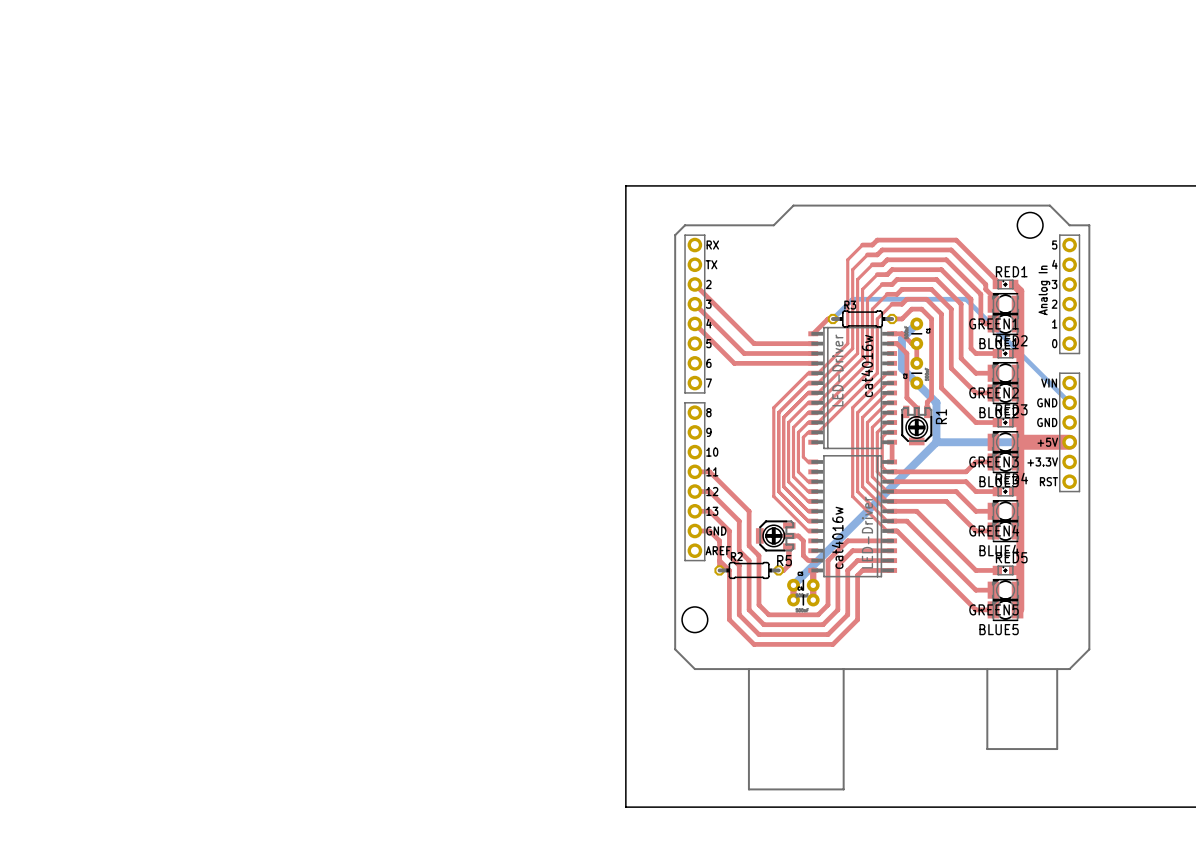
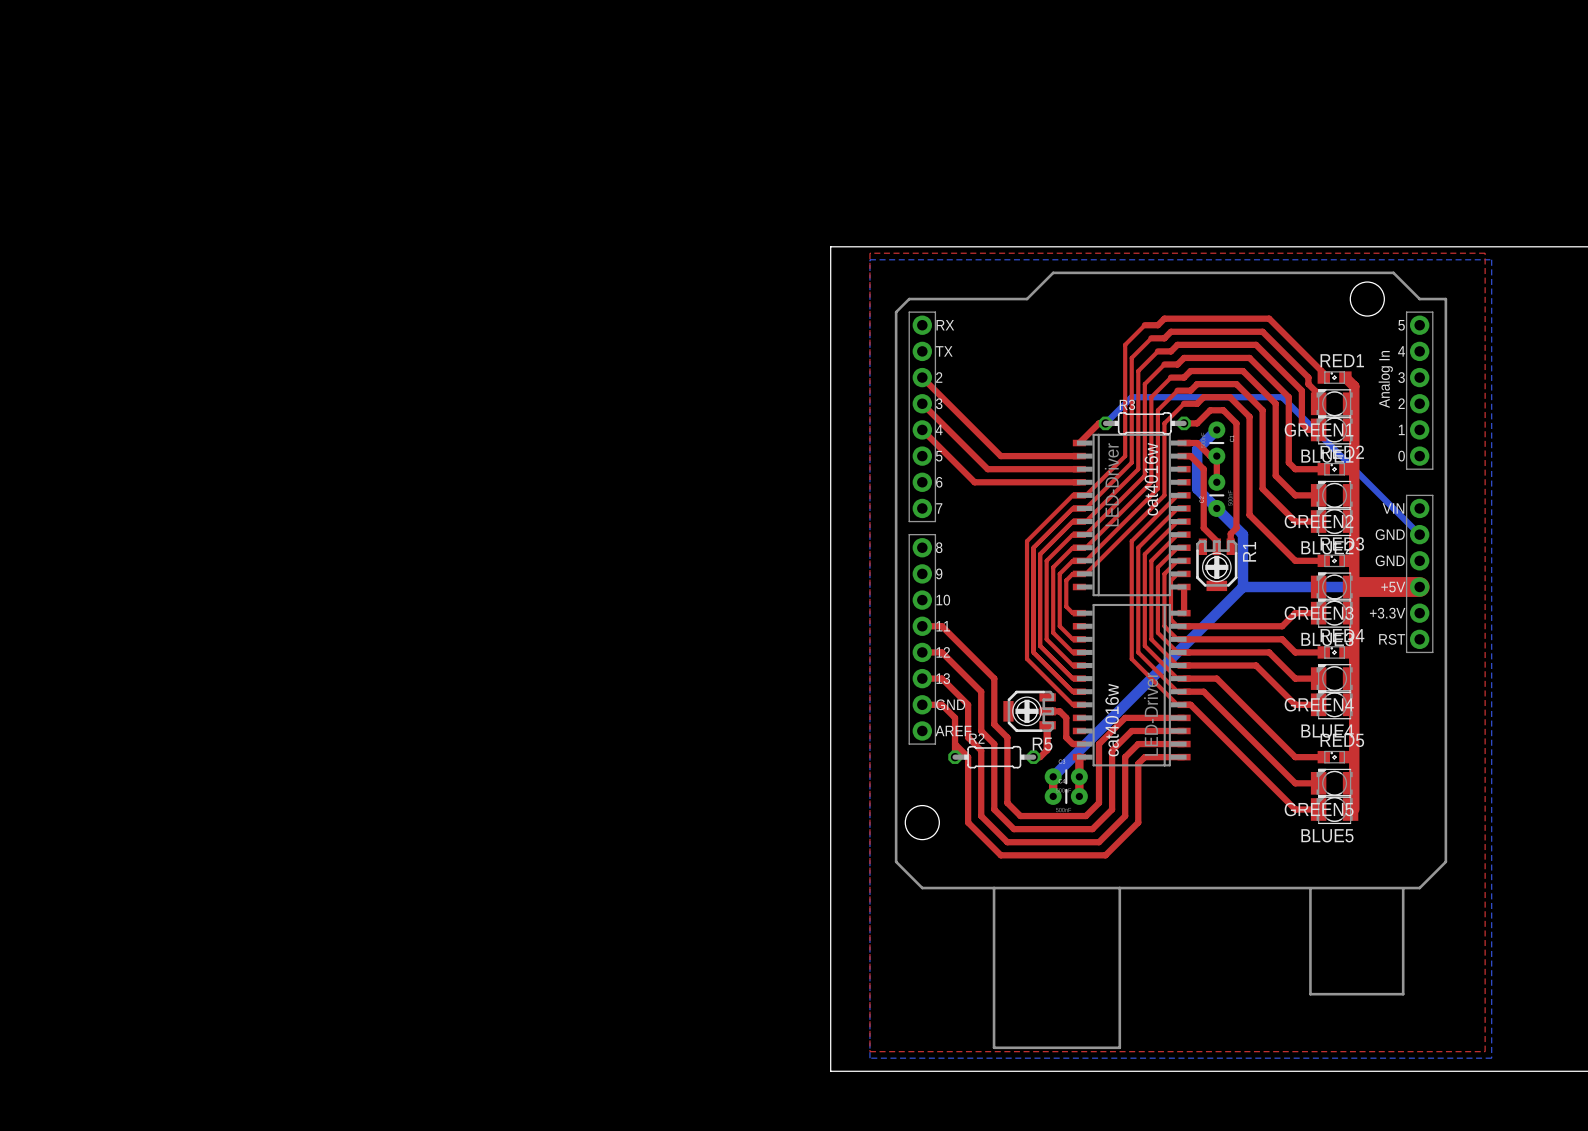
top zone outline: none -> (869, 253) (1485, 253) (1485, 1051) (869, 1051) (869, 253)
bottom zone outline: none -> (869, 259) (1491, 259) (1491, 1058) (869, 1058) (869, 259)

